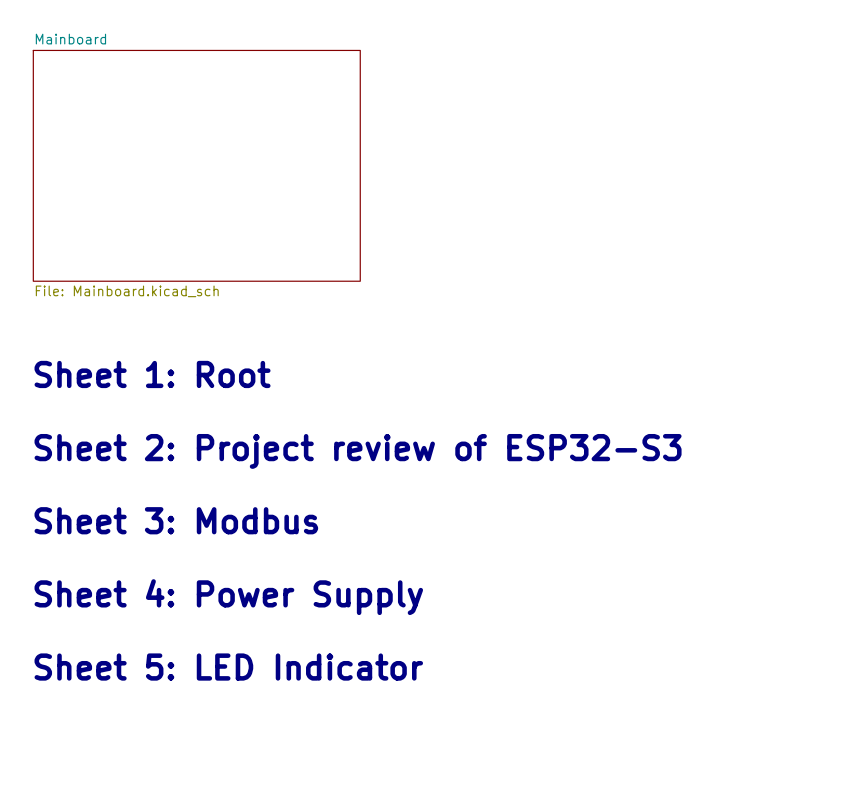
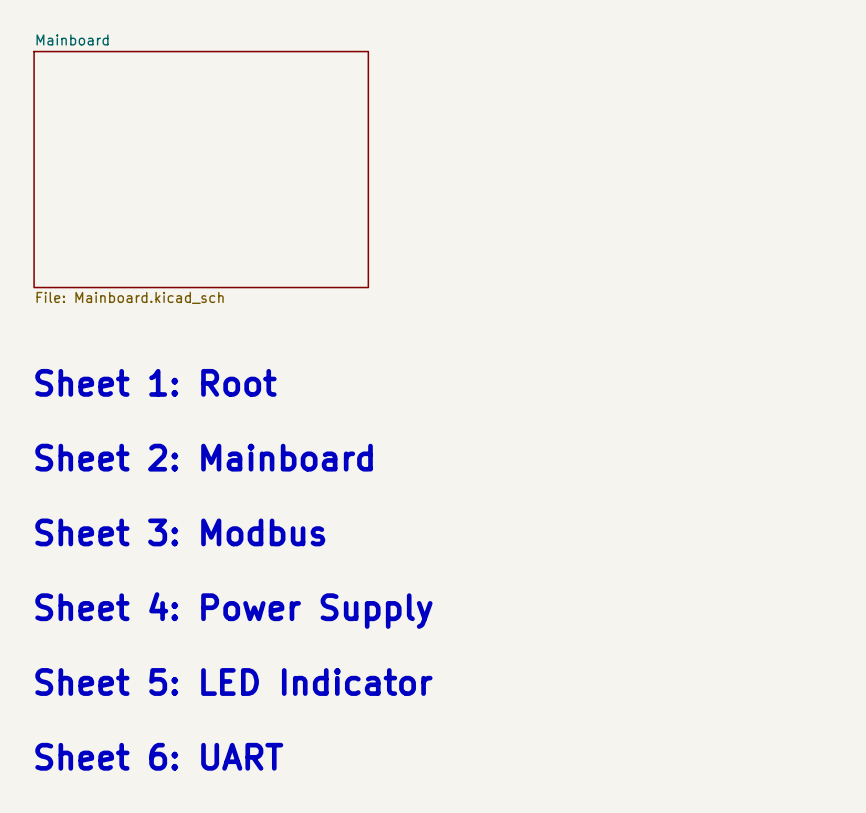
text: Sheet 2: Project review of ESP32-S3 (358, 451) -> Sheet 2: Mainboard (204, 457)
text: none -> Sheet 6: UART (159, 756)

